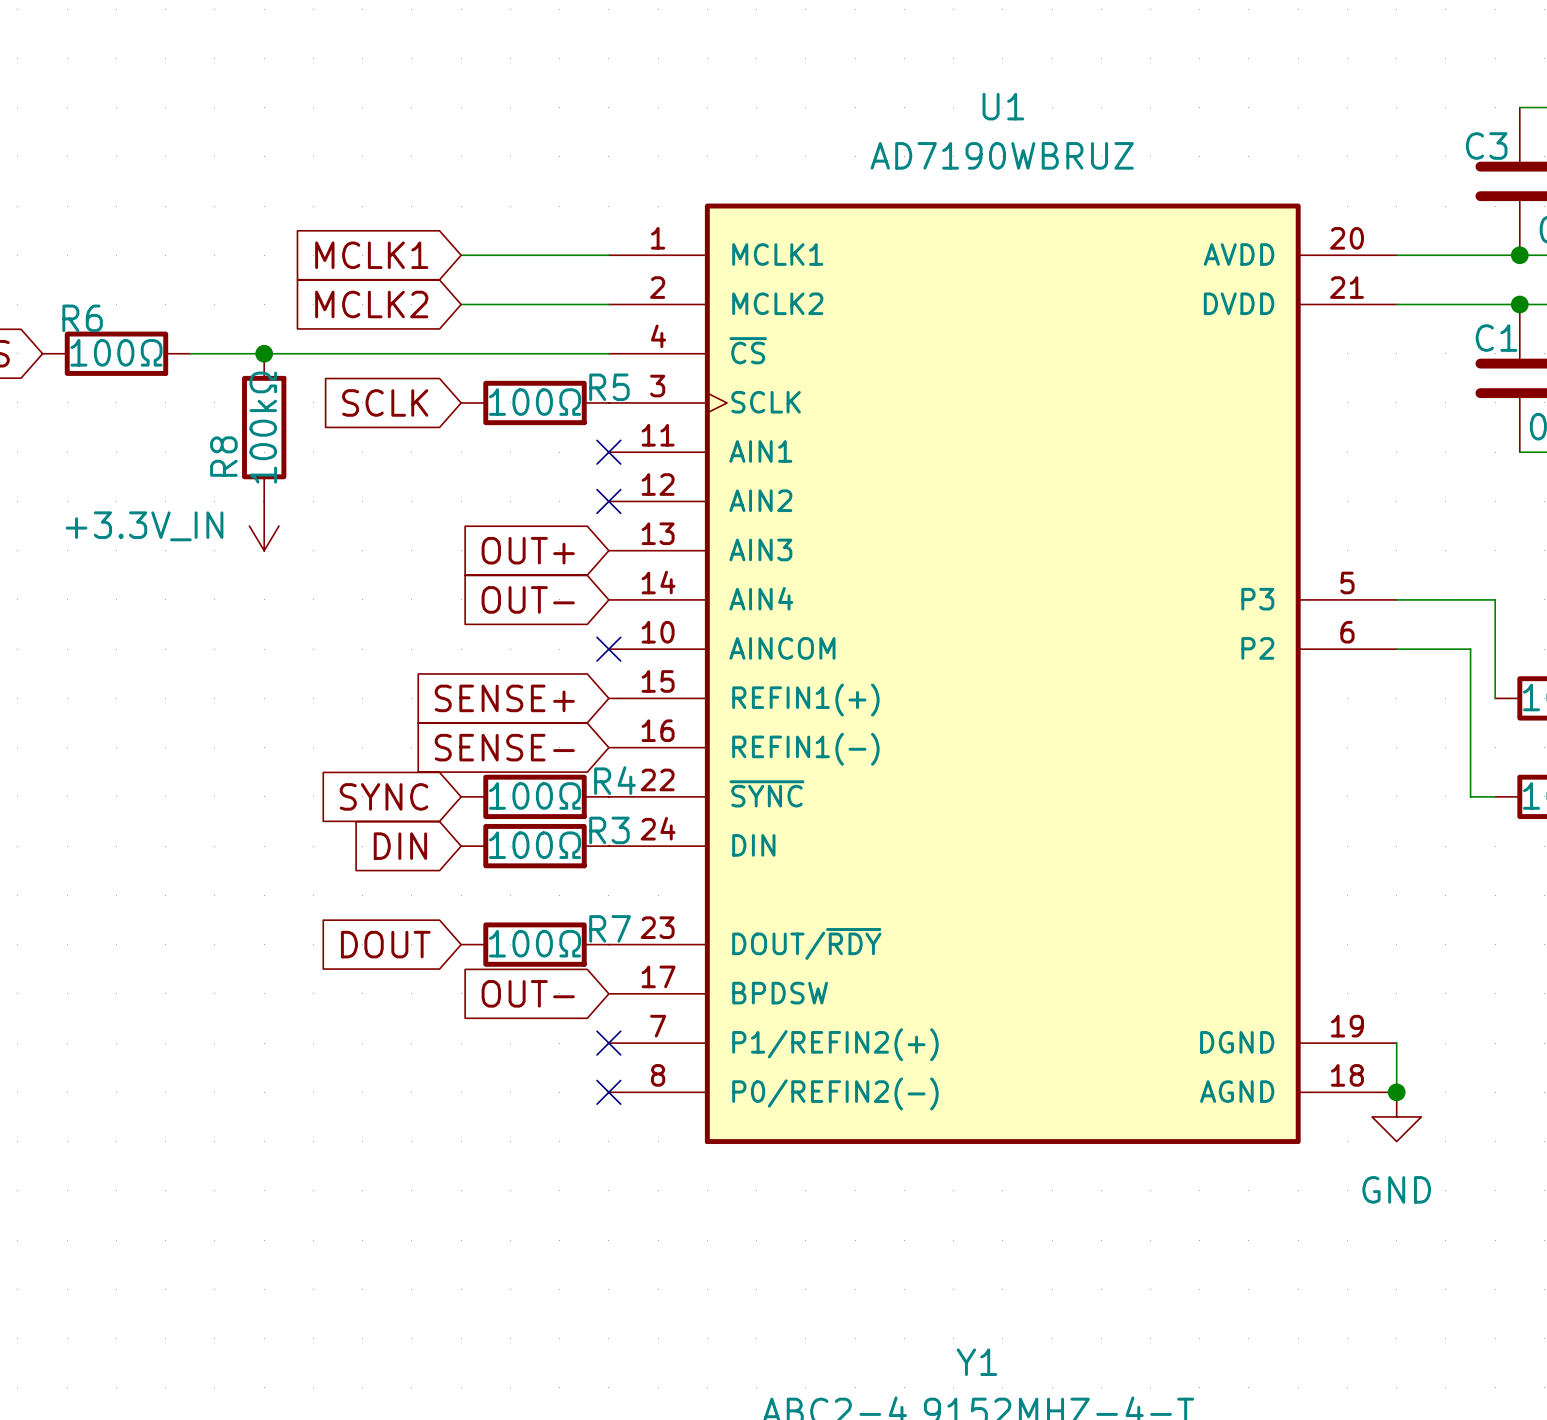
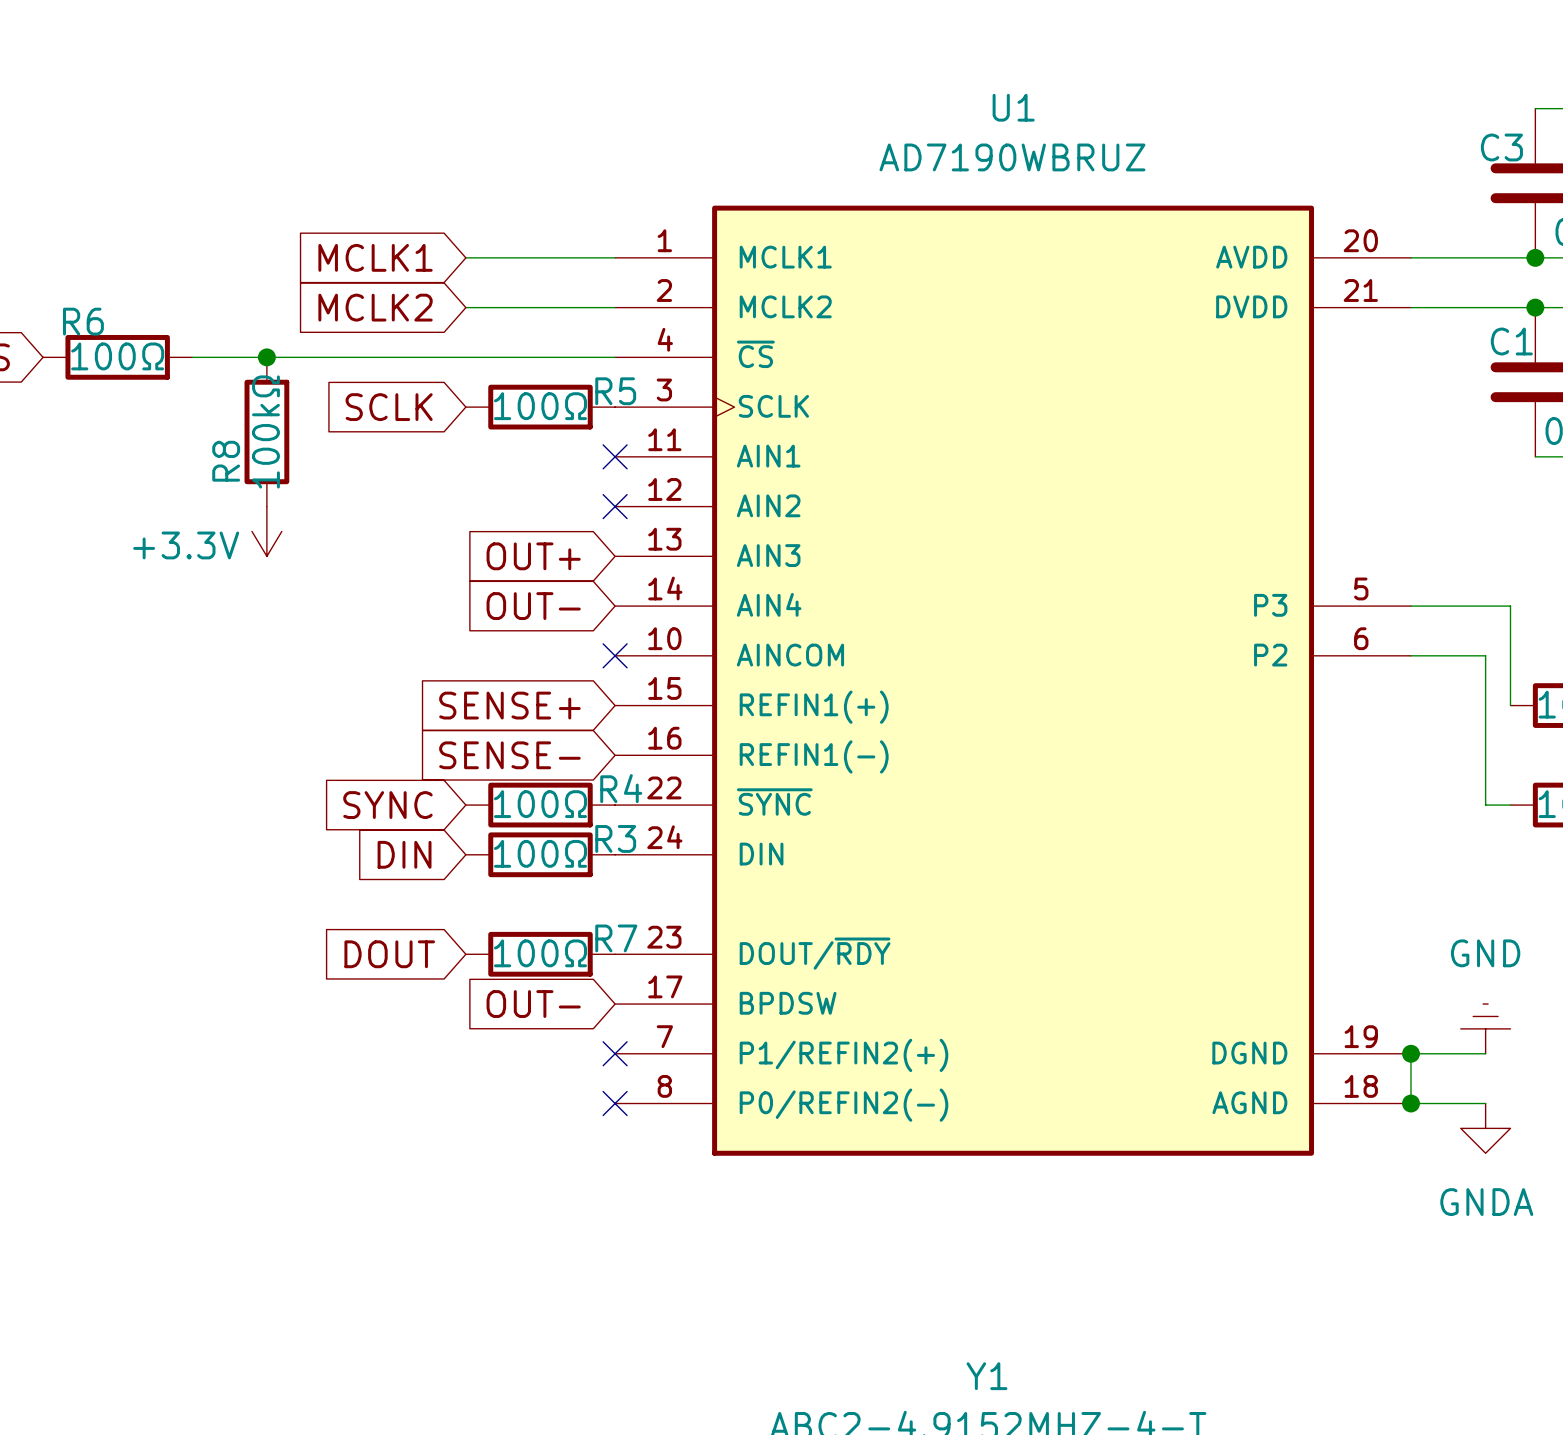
power symbol: +3.3V_IN (264, 526) -> +3.3V (266, 531)
power symbol: none -> GND (1485, 1028)
wire: none -> (1411, 1053) (1485, 1053)
junction: none -> (1411, 1053)
wire: none -> (1411, 1103) (1485, 1103)
power symbol: GND (1396, 1116) -> none
power symbol: none -> GNDA (1485, 1128)

